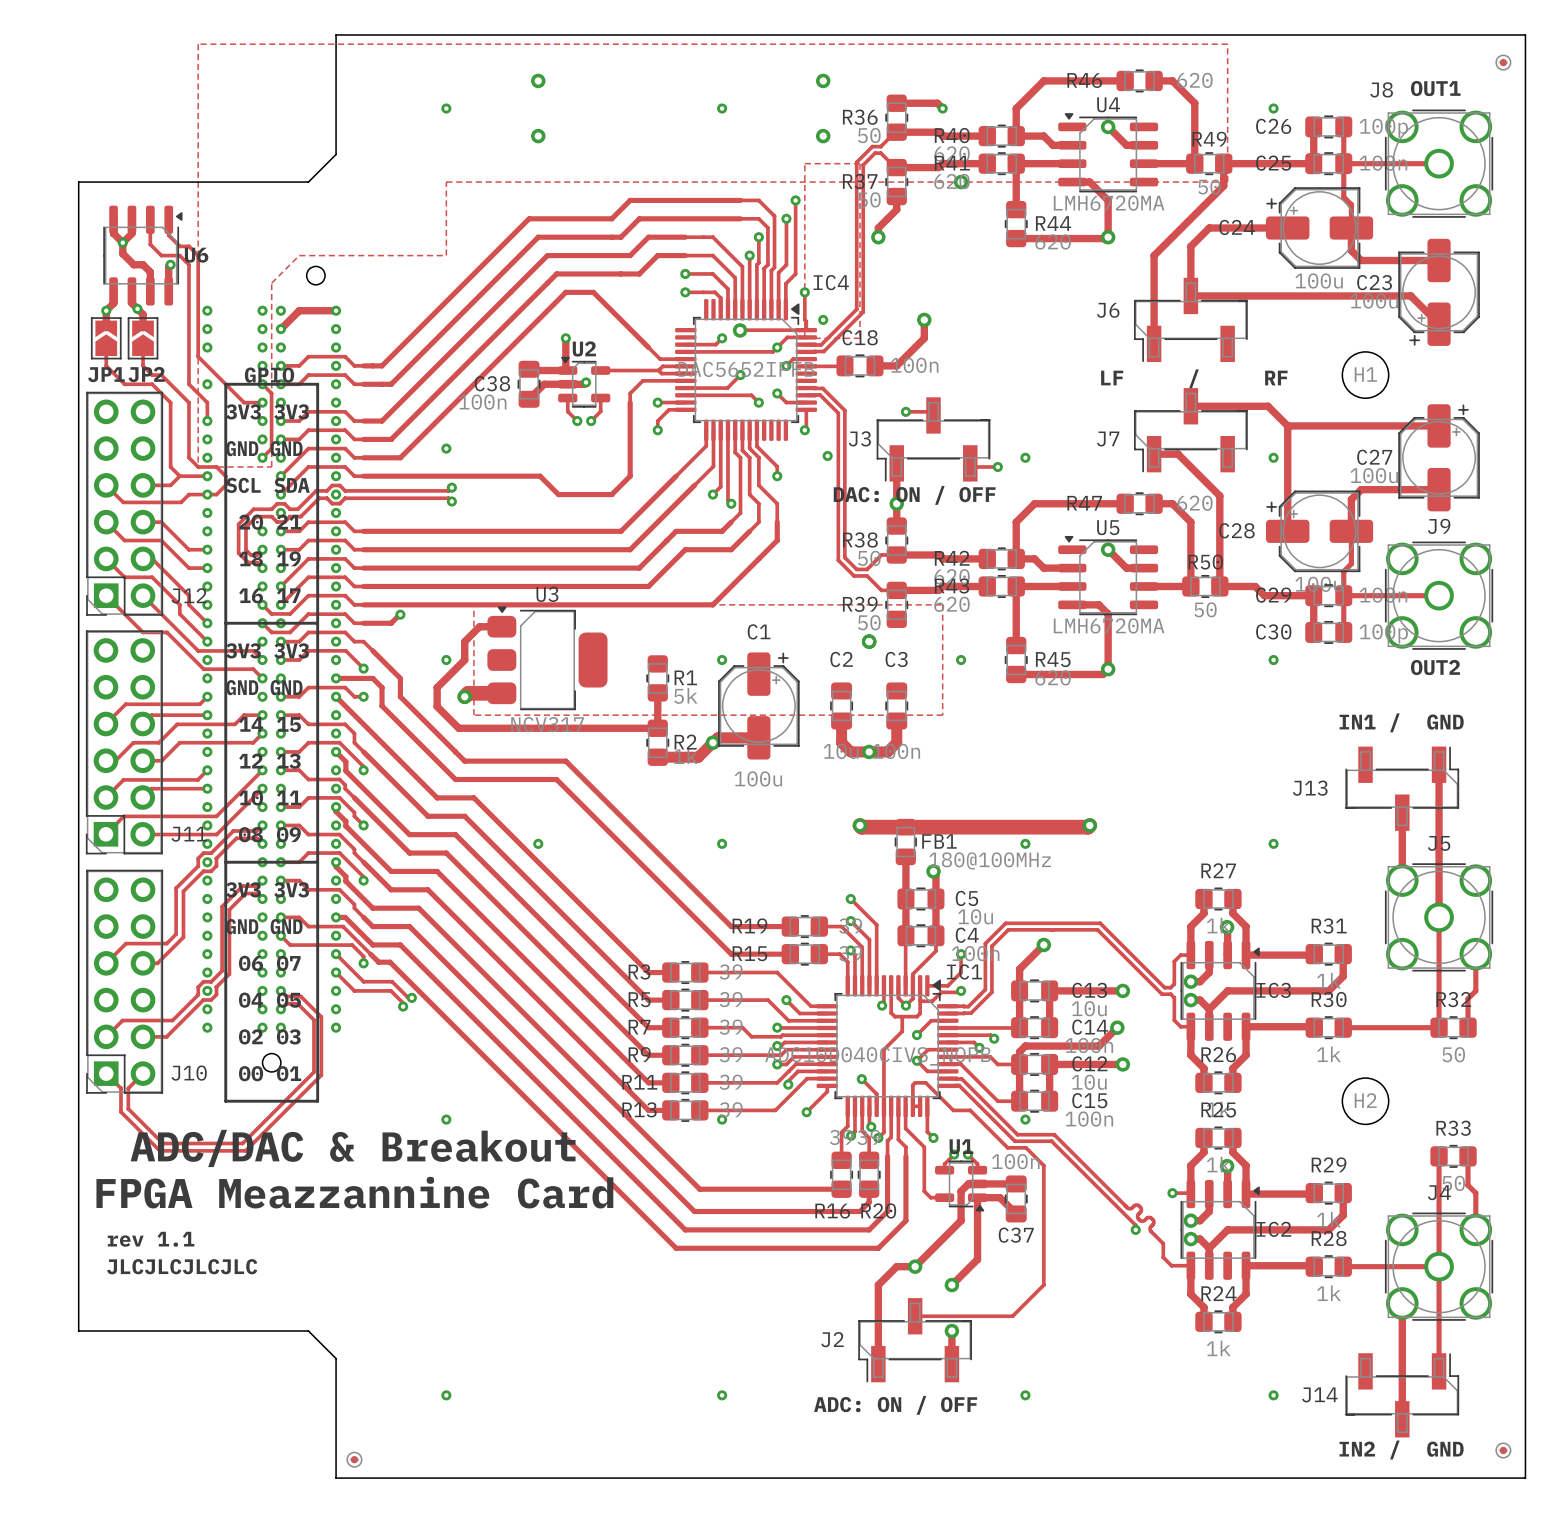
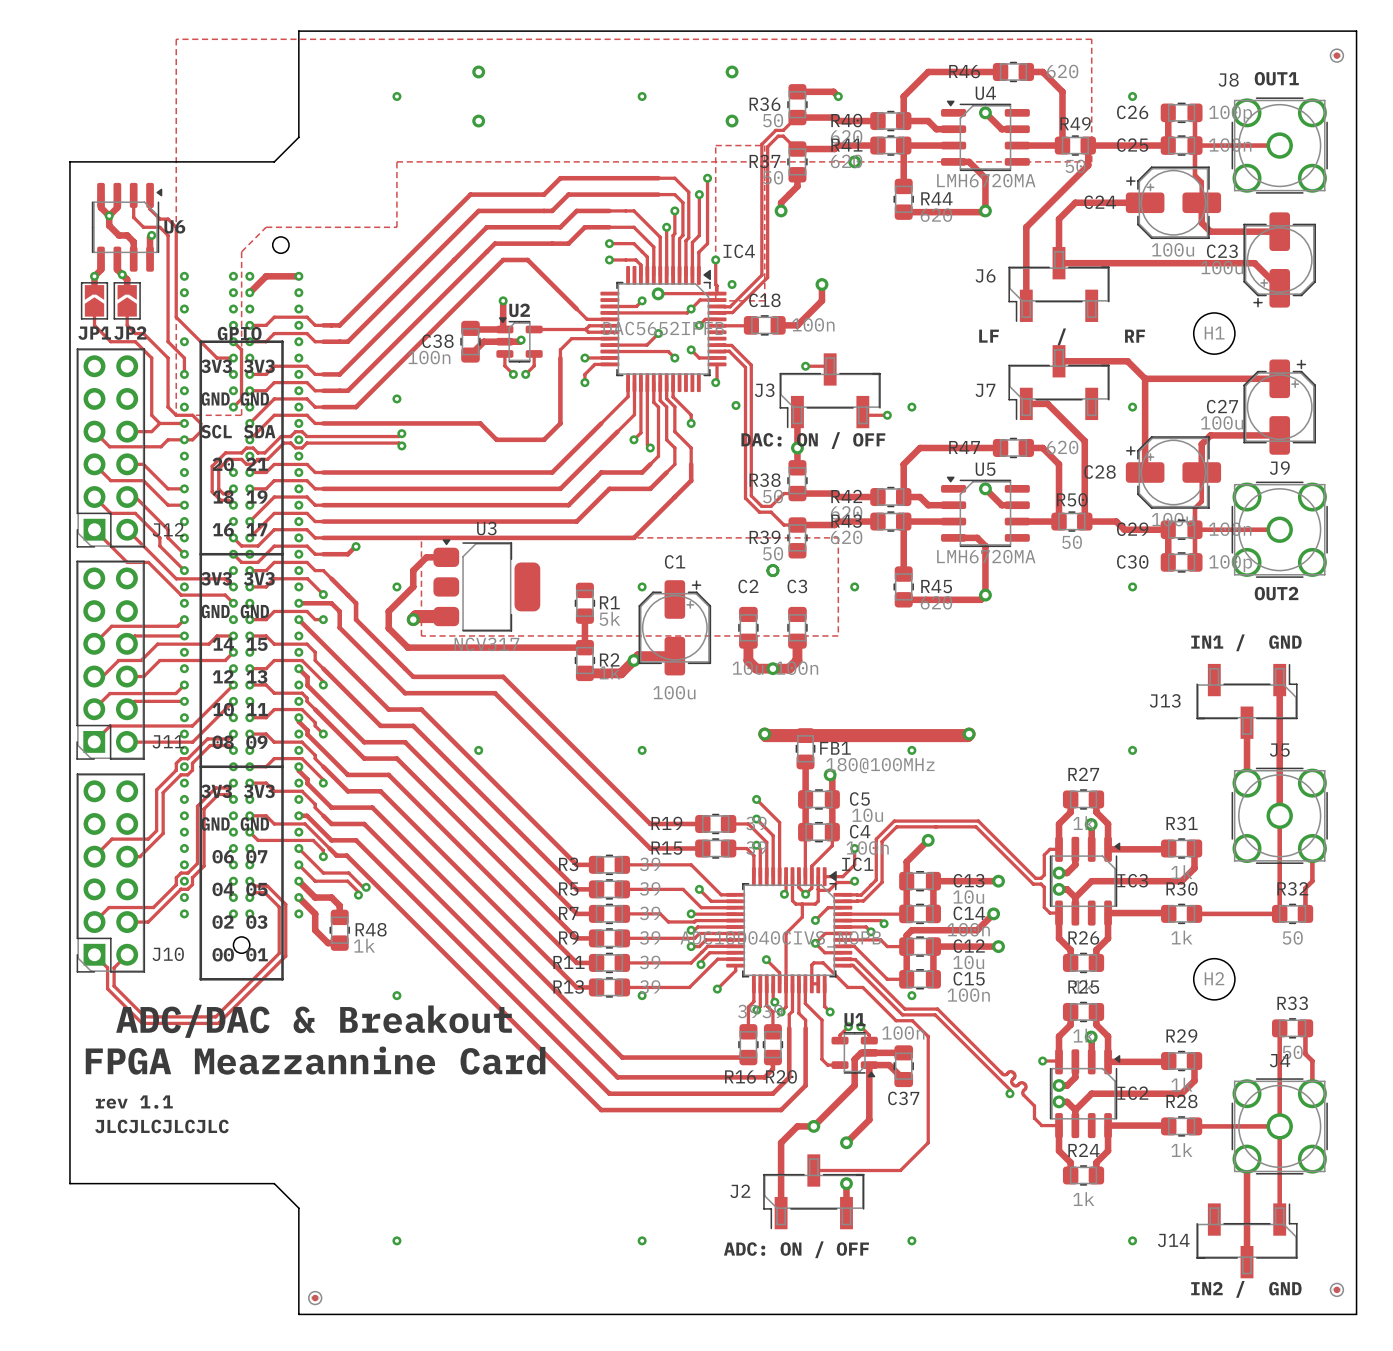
track: none -> (298, 881) (315, 897) (331, 897) (339, 905) (339, 917)
track: none -> (298, 897) (315, 913) (315, 930) (328, 943) (339, 943)
R48: none -> 1k (339, 930)

